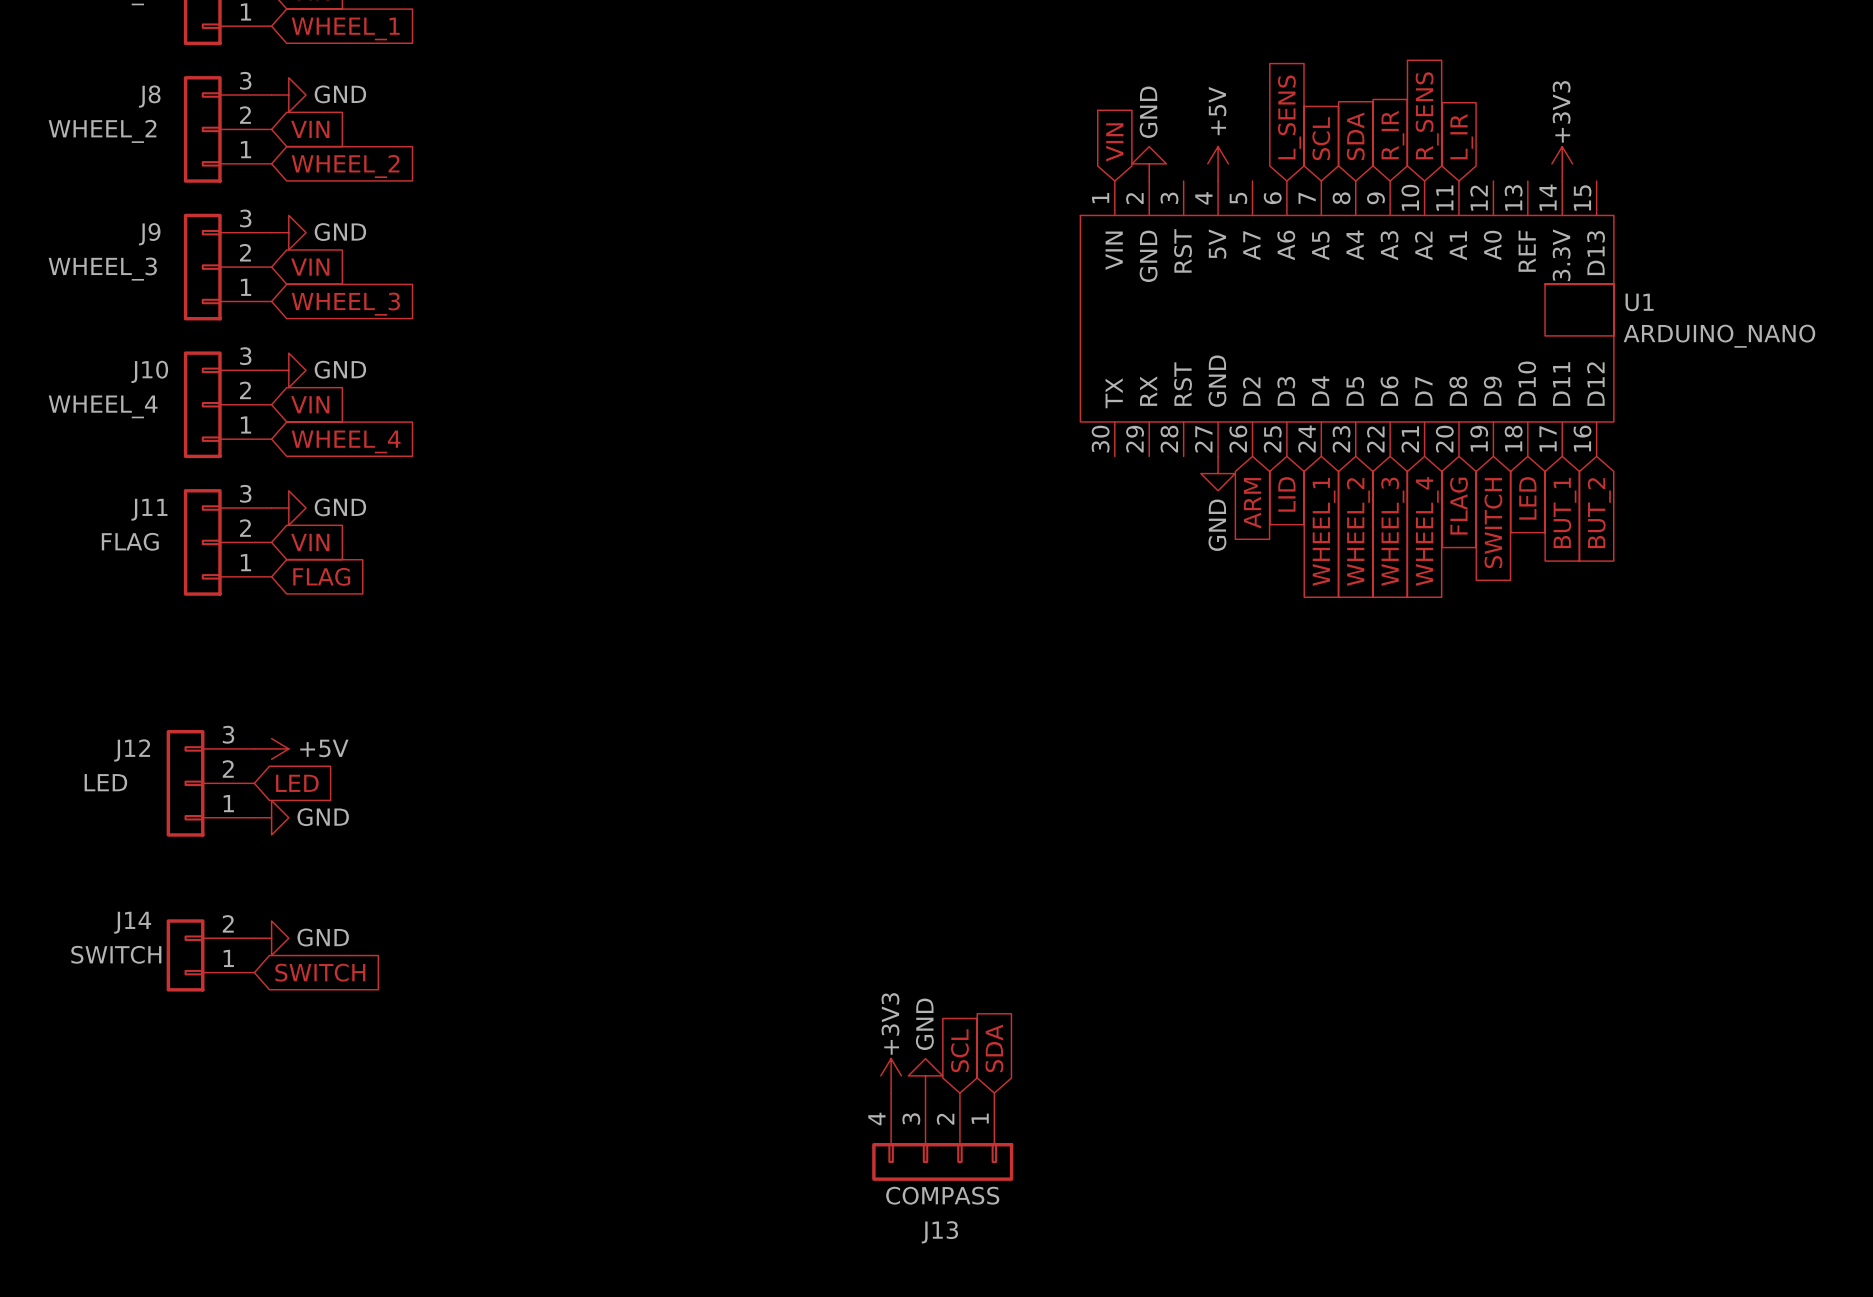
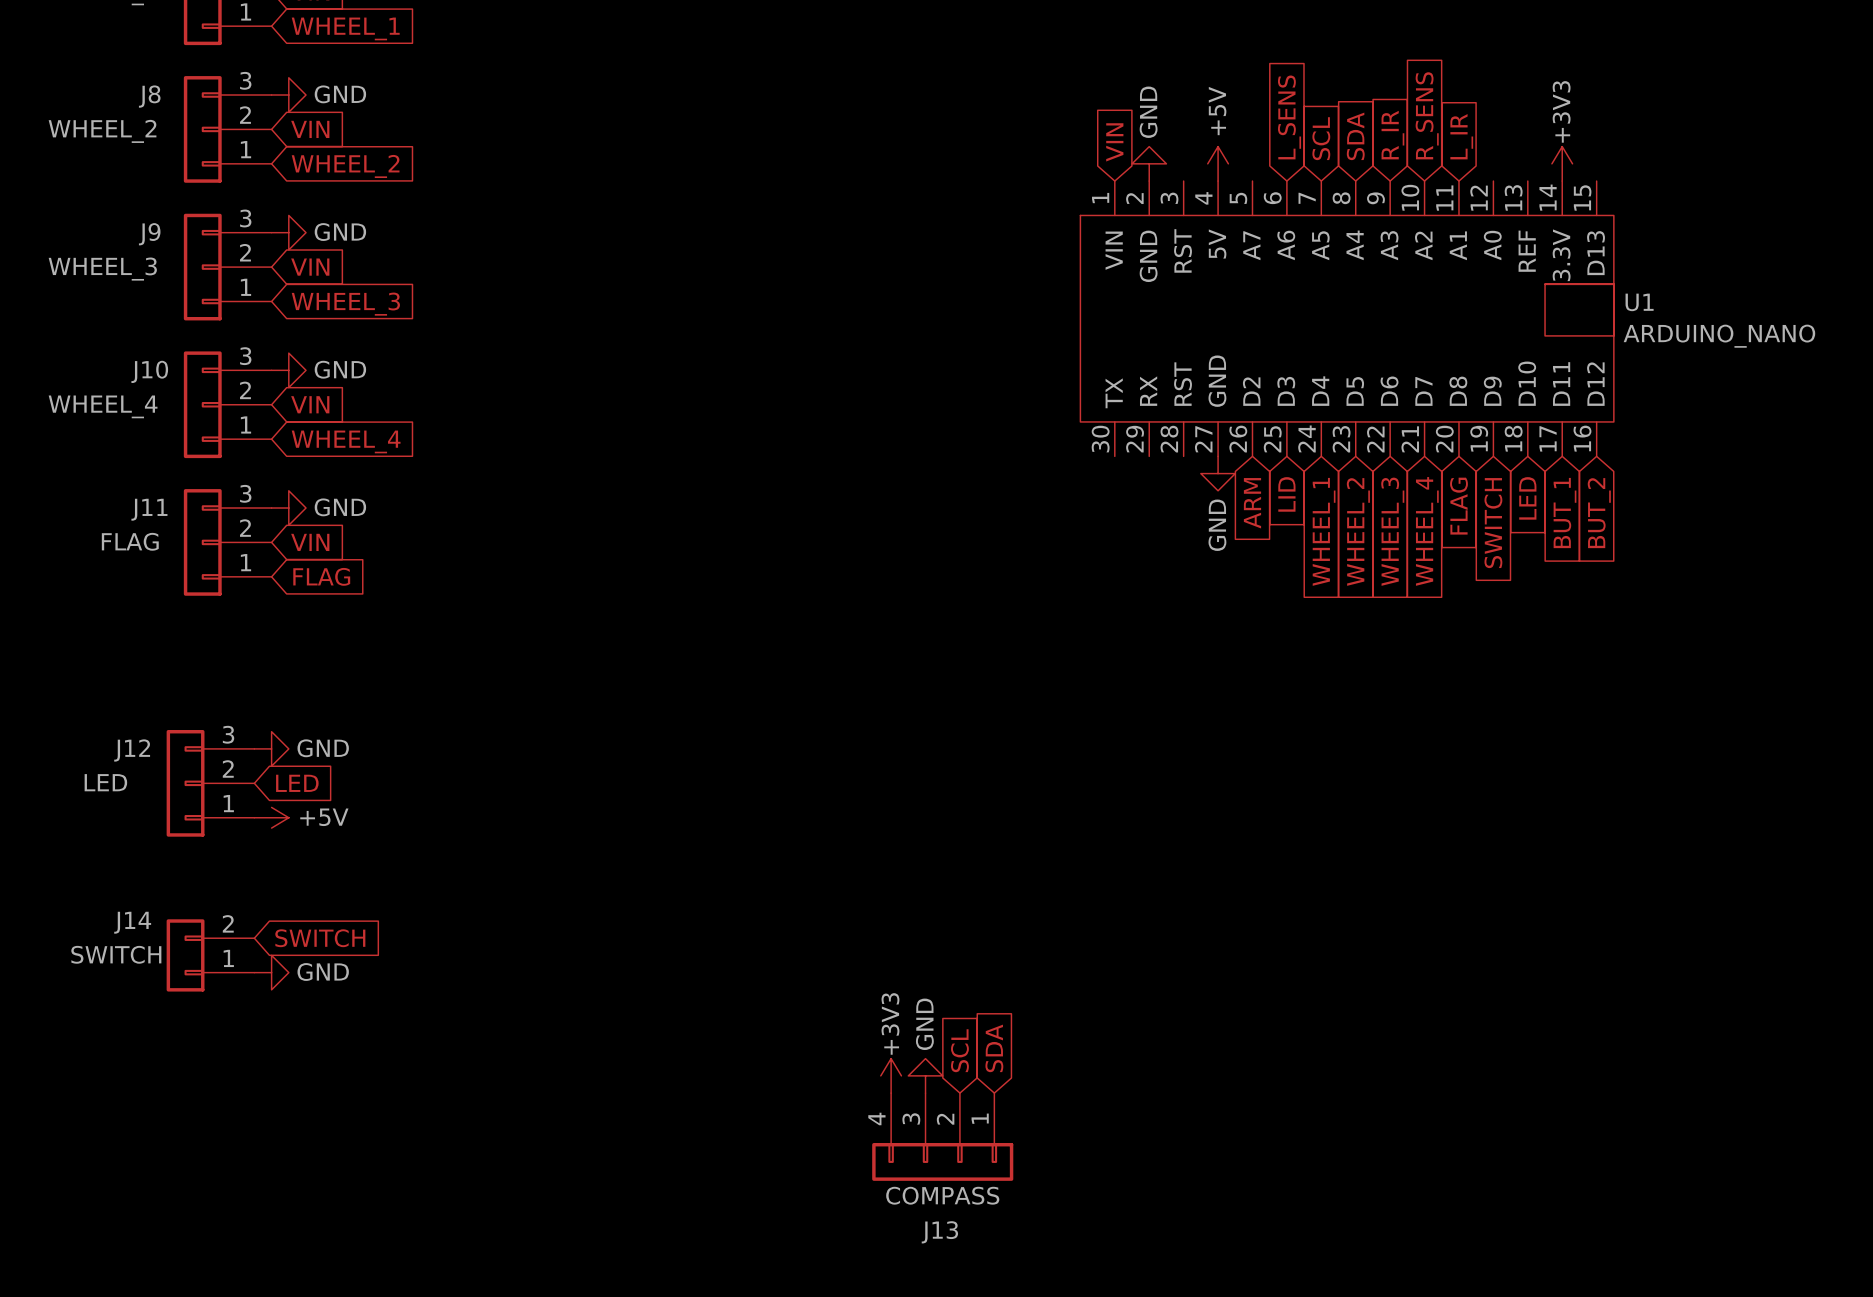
power symbol: +5V (271, 748) -> GND (271, 748)
power symbol: GND (271, 817) -> +5V (271, 817)
power symbol position: GND (271, 938) -> GND (271, 972)
global label position: SWITCH (320, 972) -> SWITCH (320, 938)

